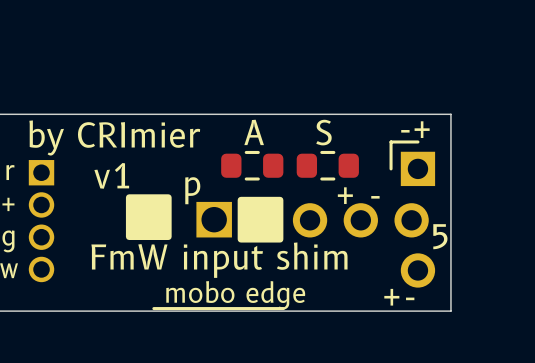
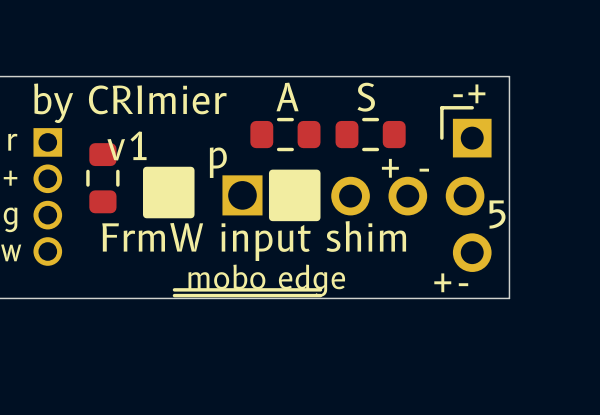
part: none -> (102, 178)
text: FmW input shim (219, 260) -> FrmW input shim (254, 241)
line: none -> (174, 289) (320, 289)

